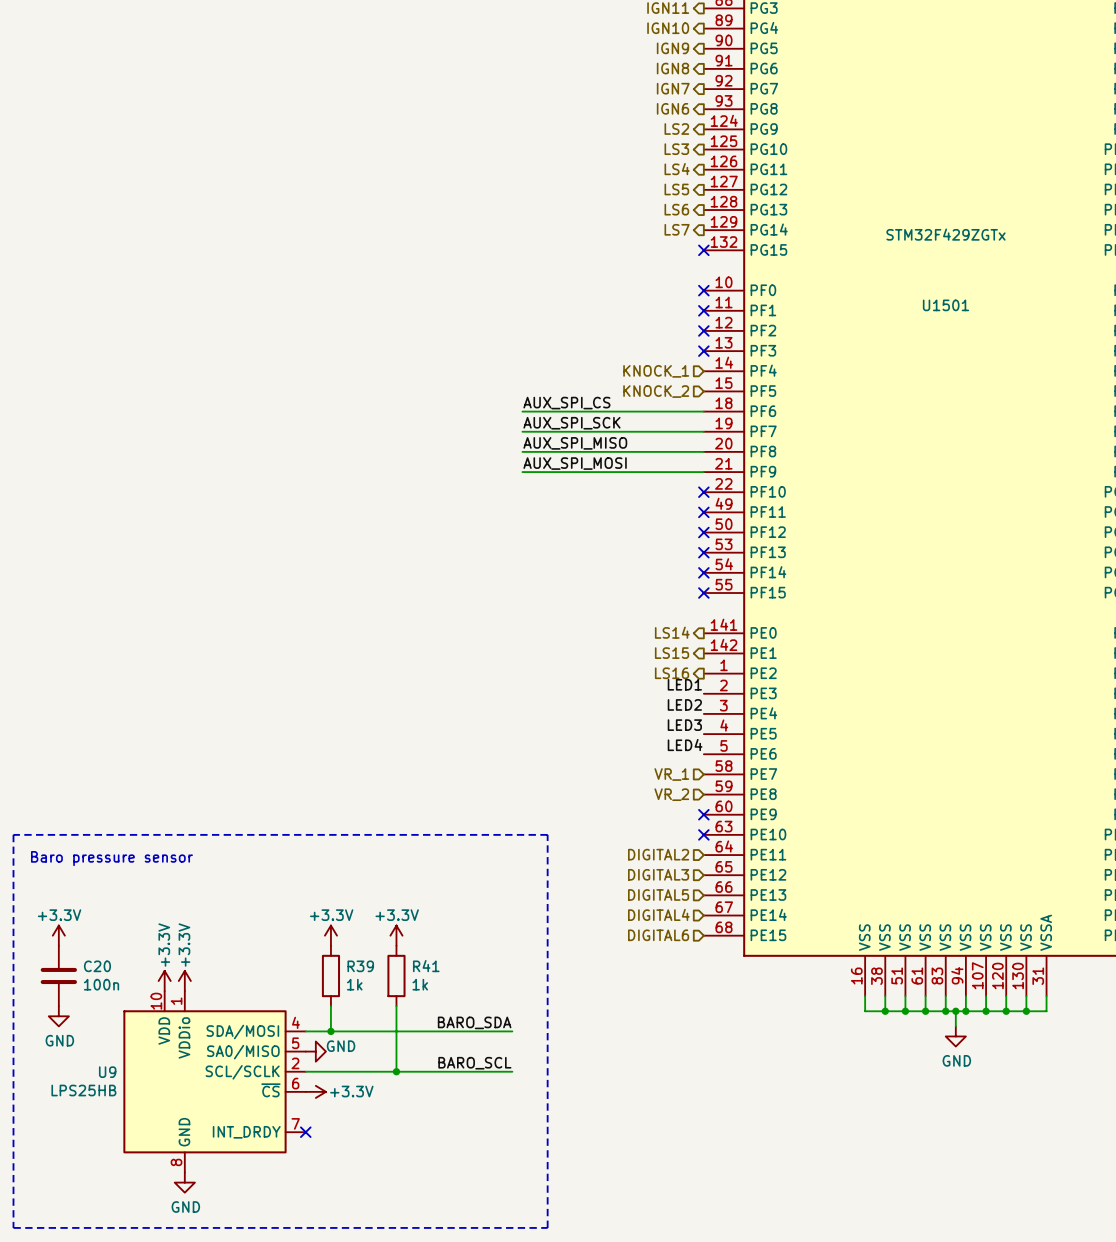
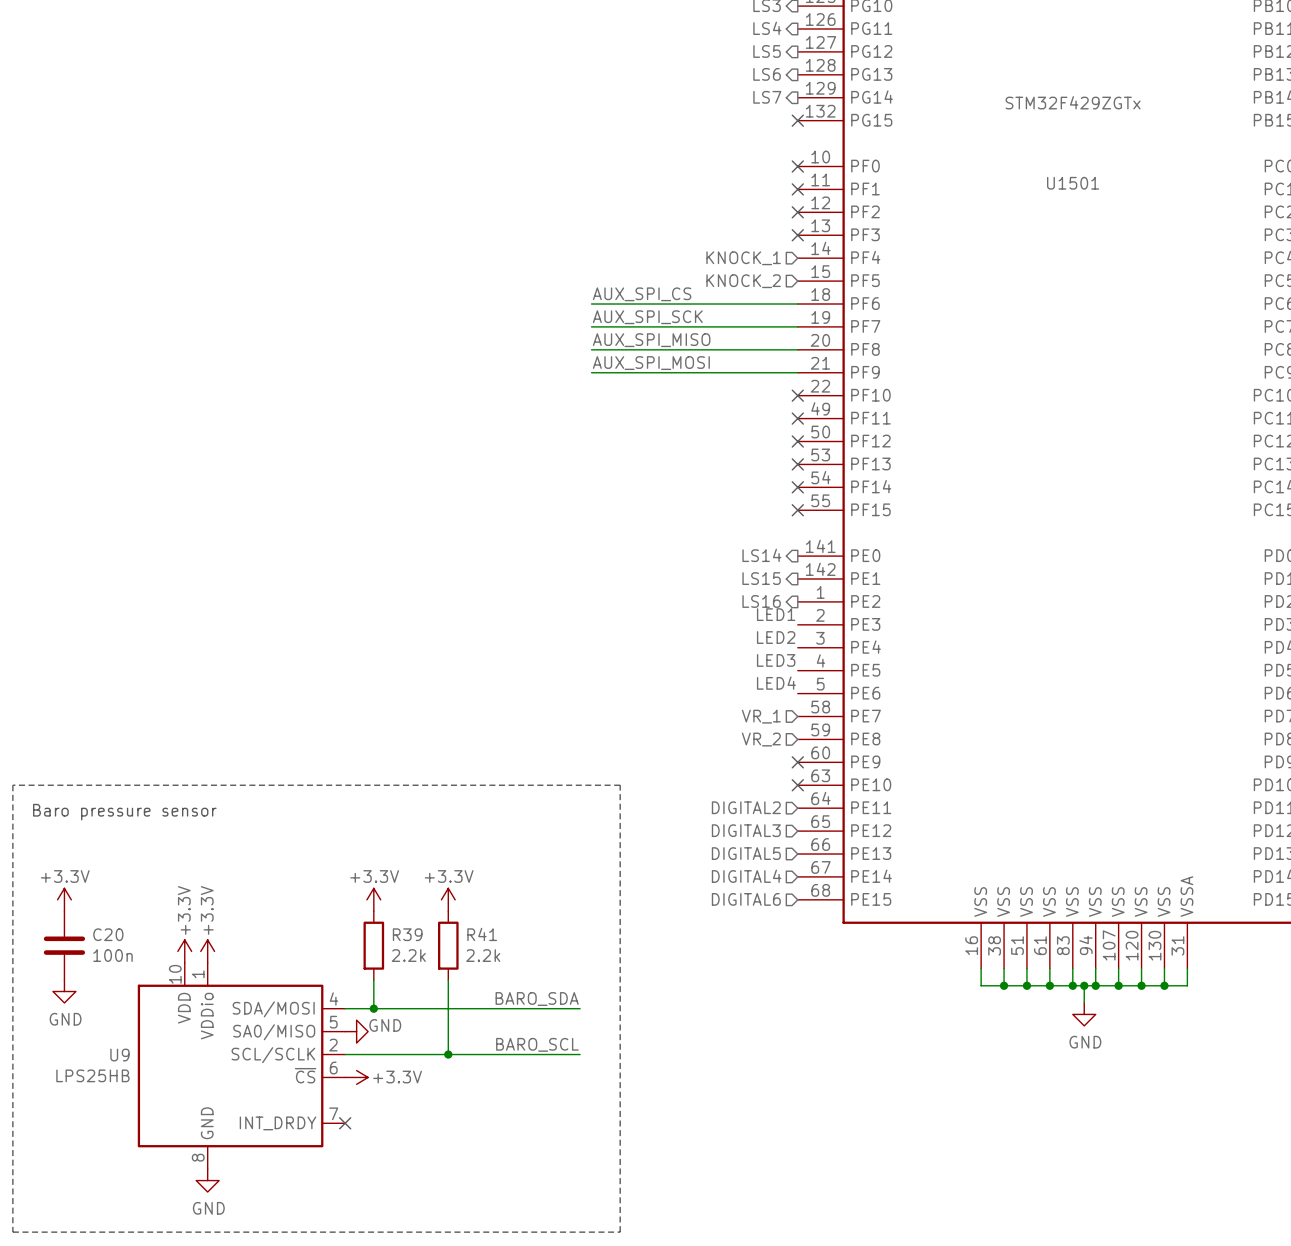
R39 value: 1k (354, 984) -> 2.2k (408, 955)
R41 value: 1k (420, 984) -> 2.2k (483, 955)

